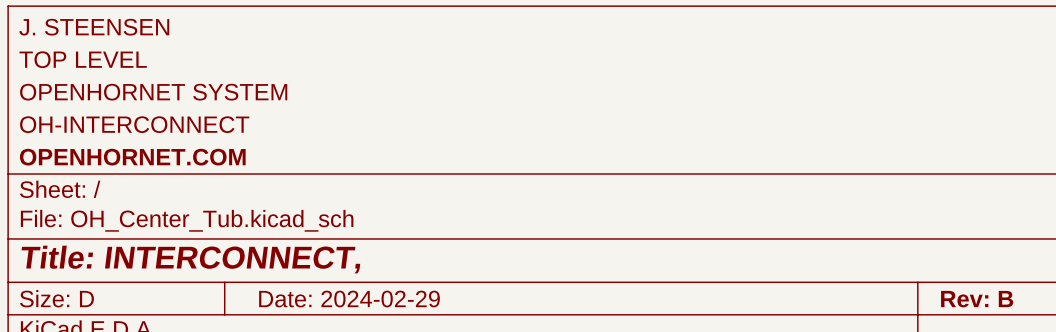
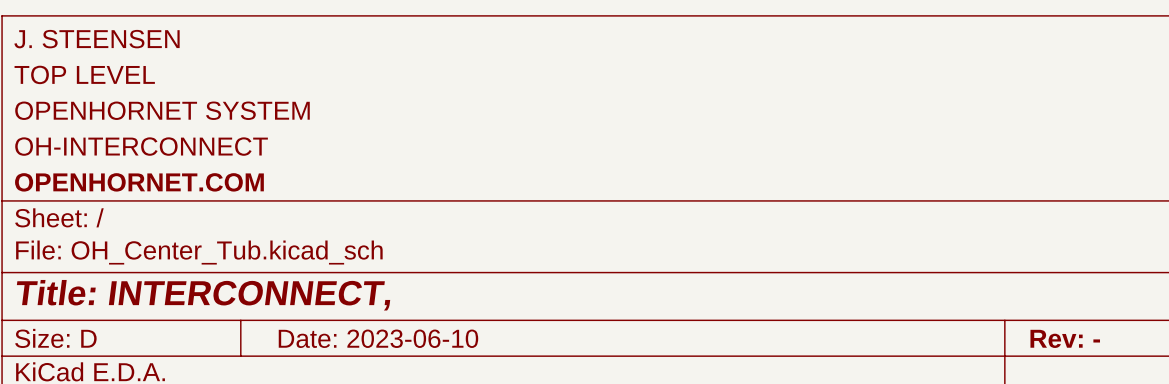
title block: Date: 2024-02-29 (349, 299) -> Date: 2023-06-10 (378, 338)
title block: Rev: B (977, 299) -> Rev: - (1065, 338)

